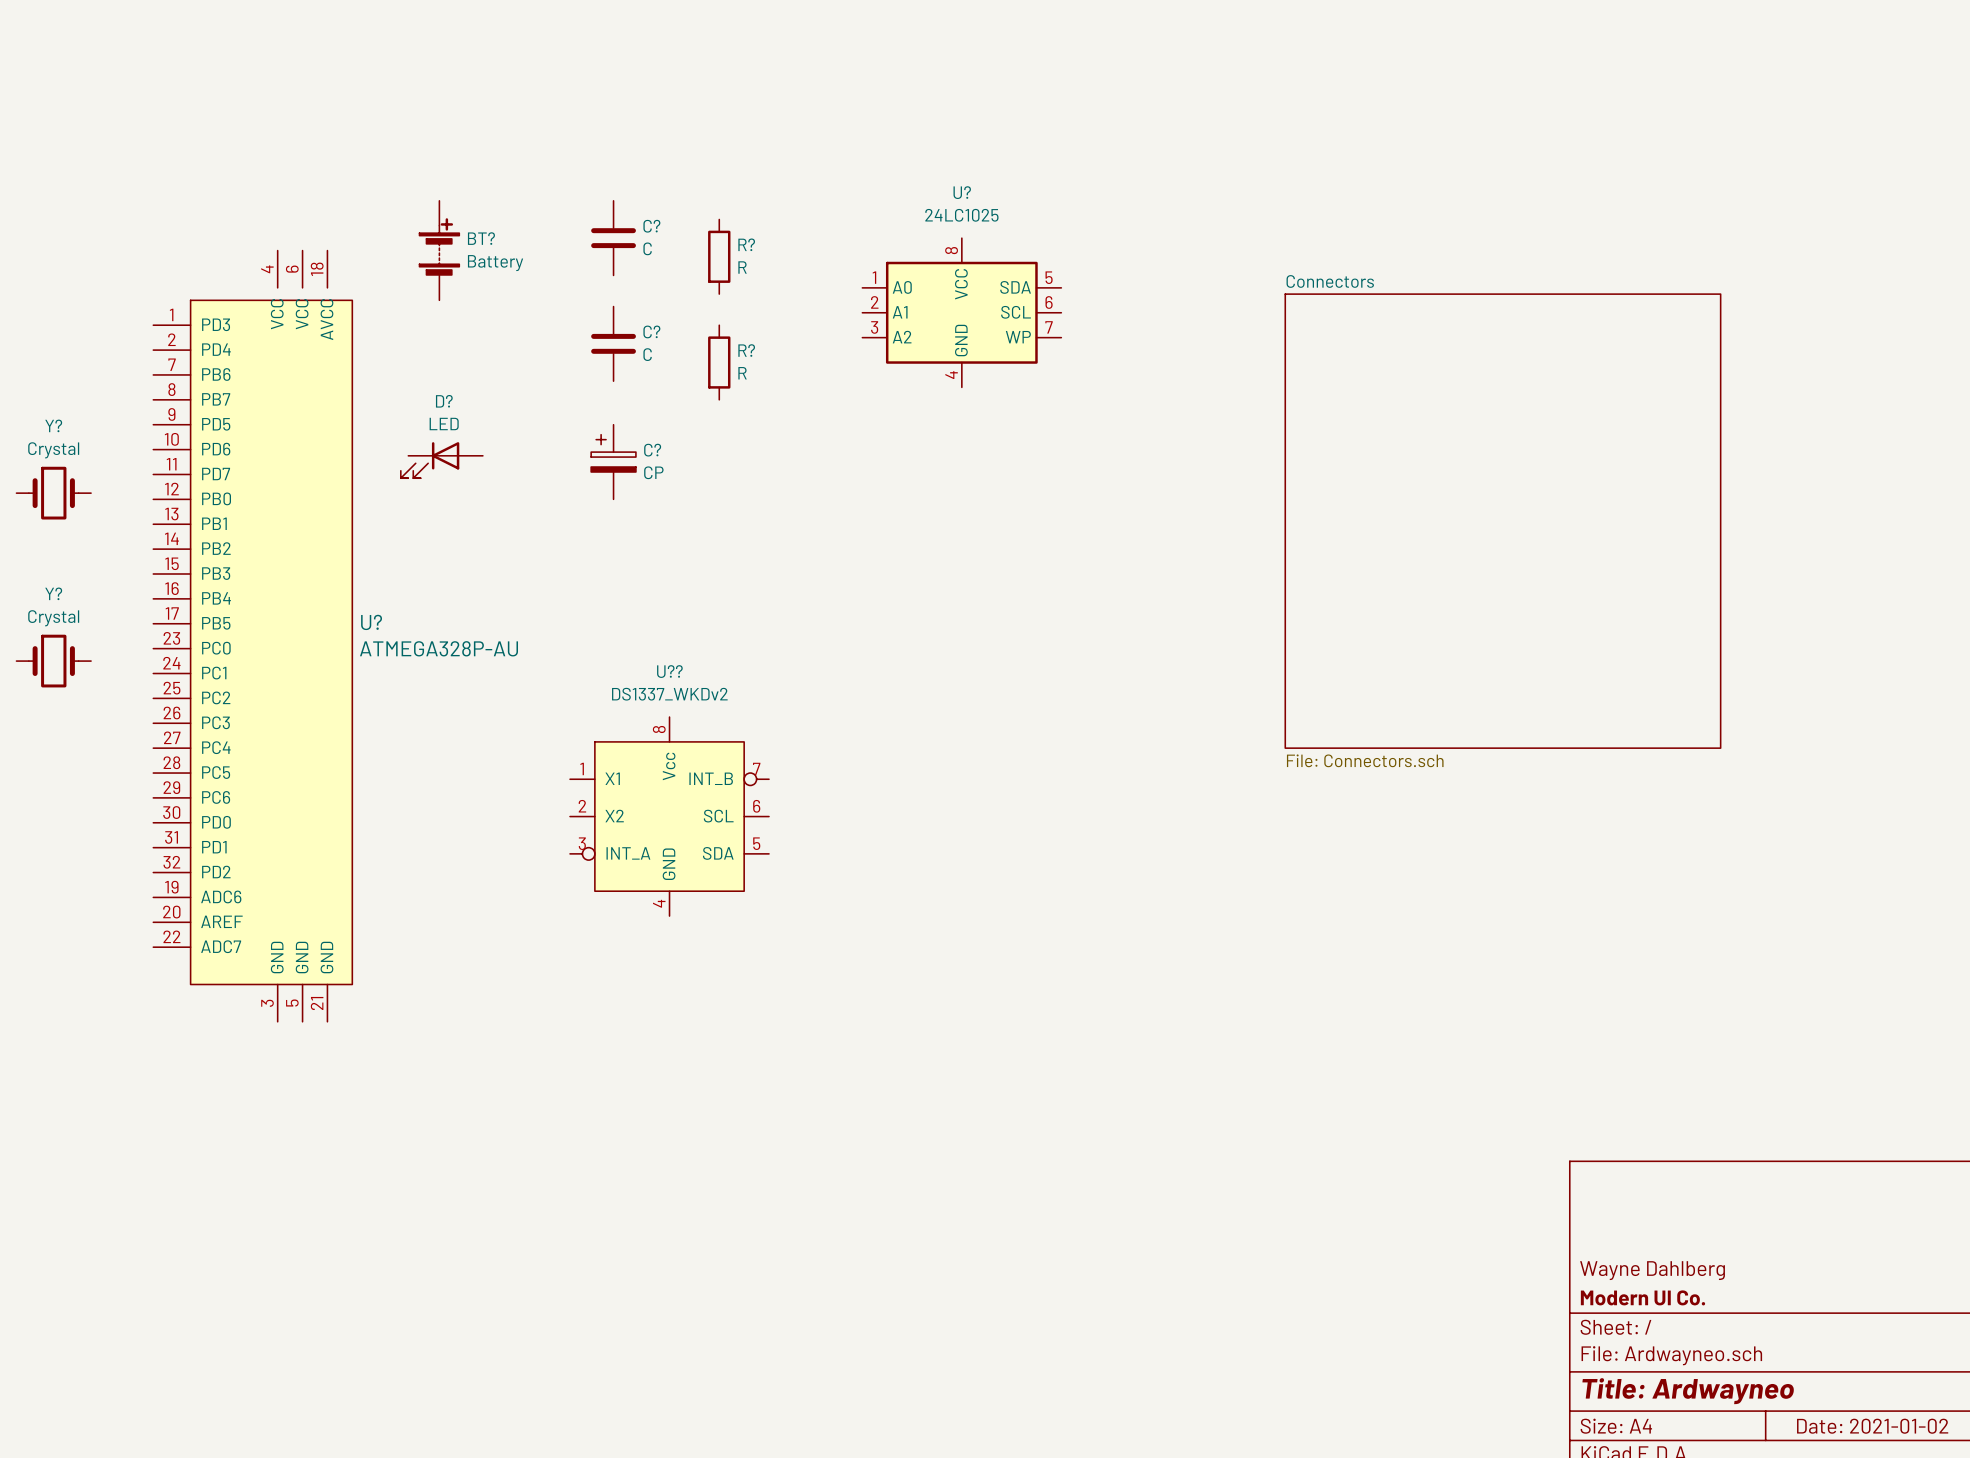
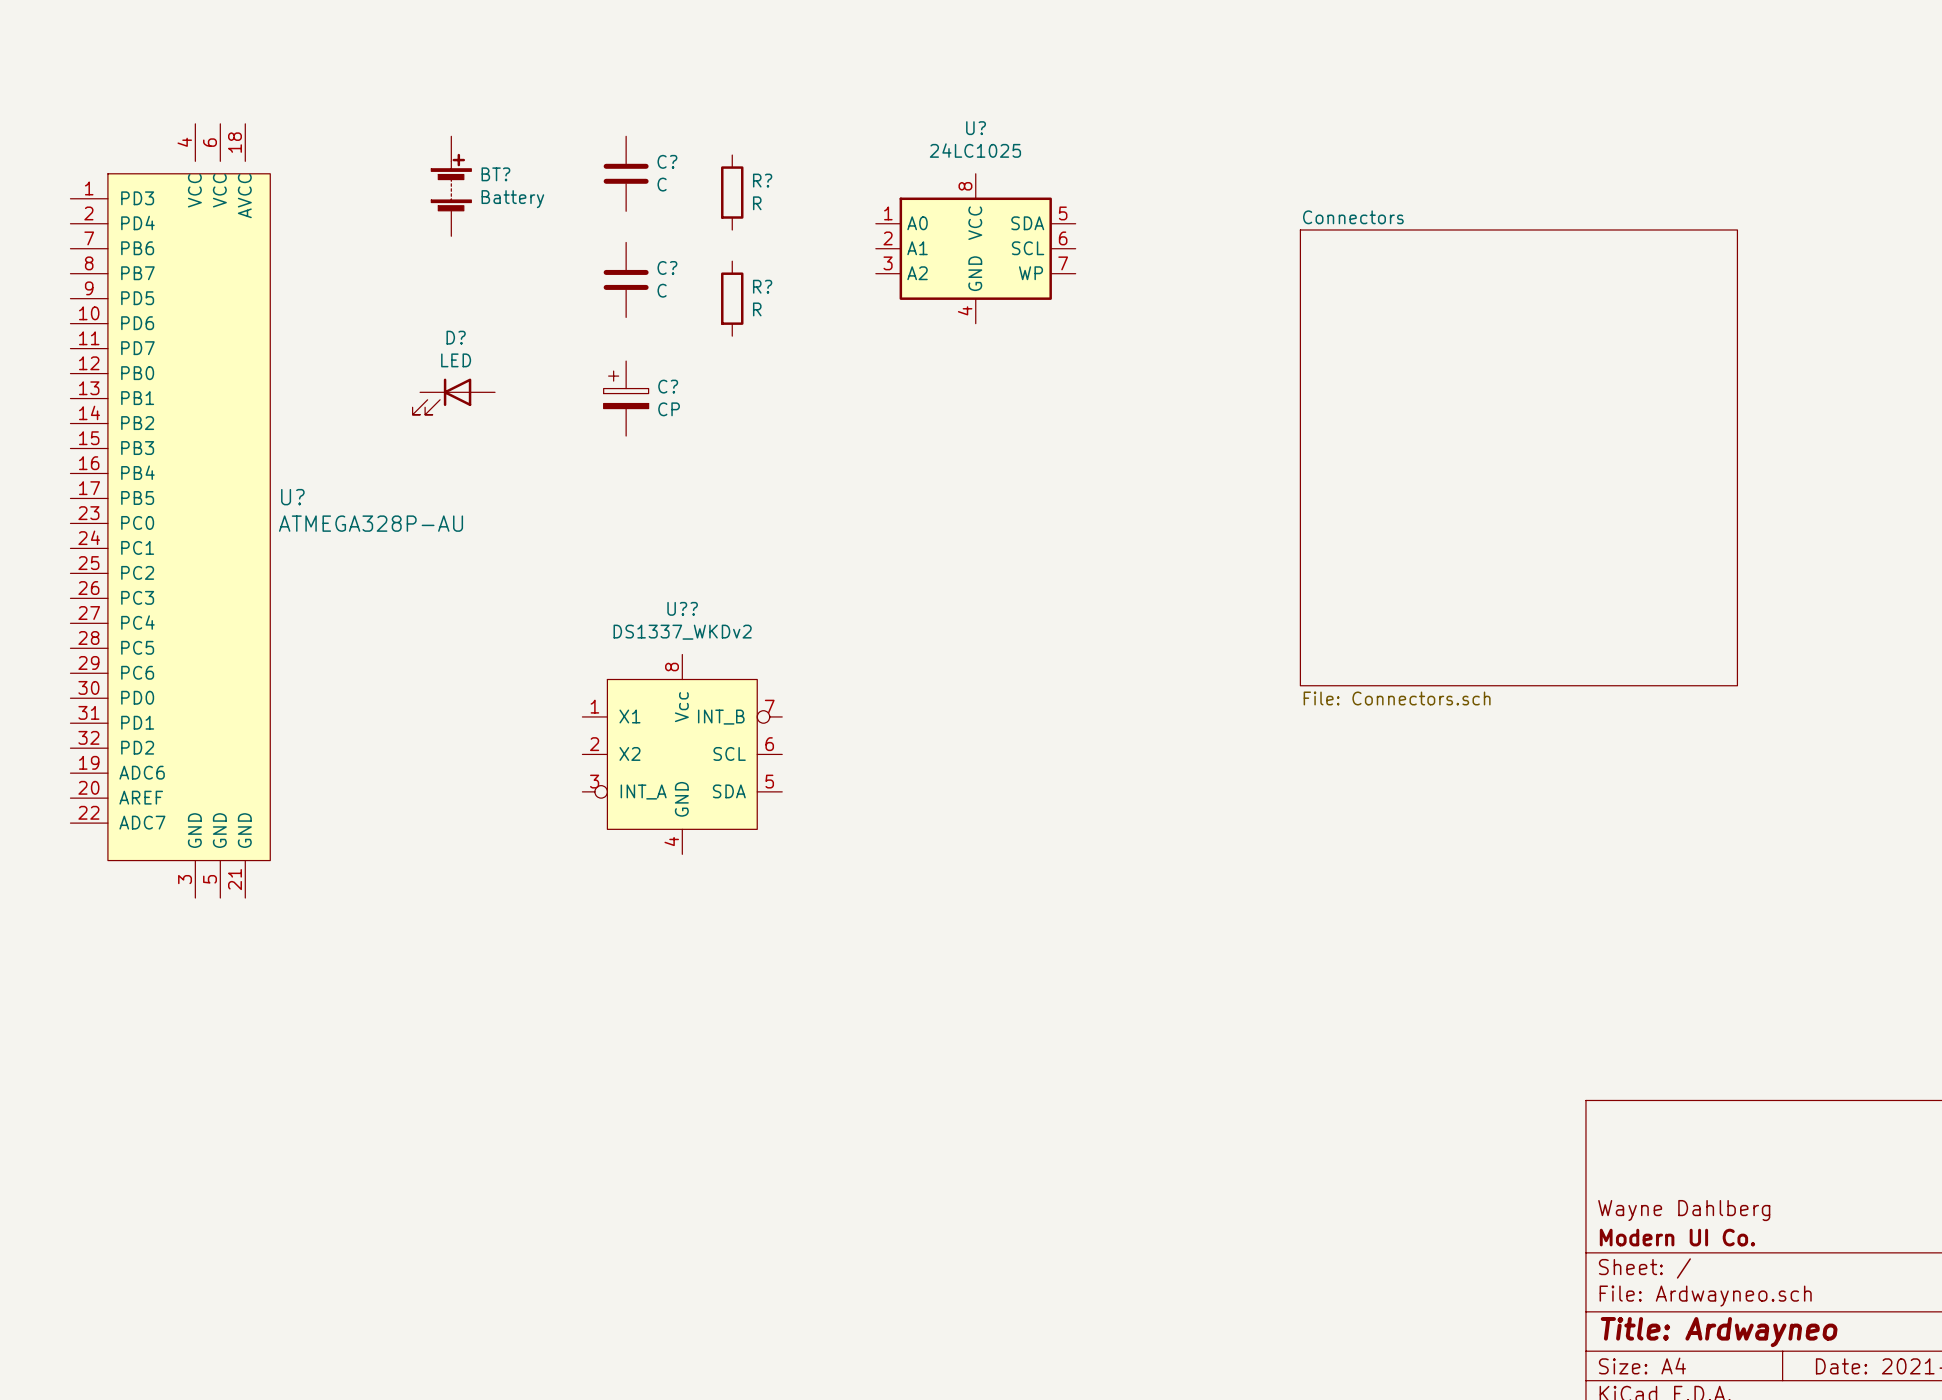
Y?: Crystal (53, 493) -> none
U? position: (252, 636) -> (170, 510)
Y?: Crystal (53, 661) -> none

